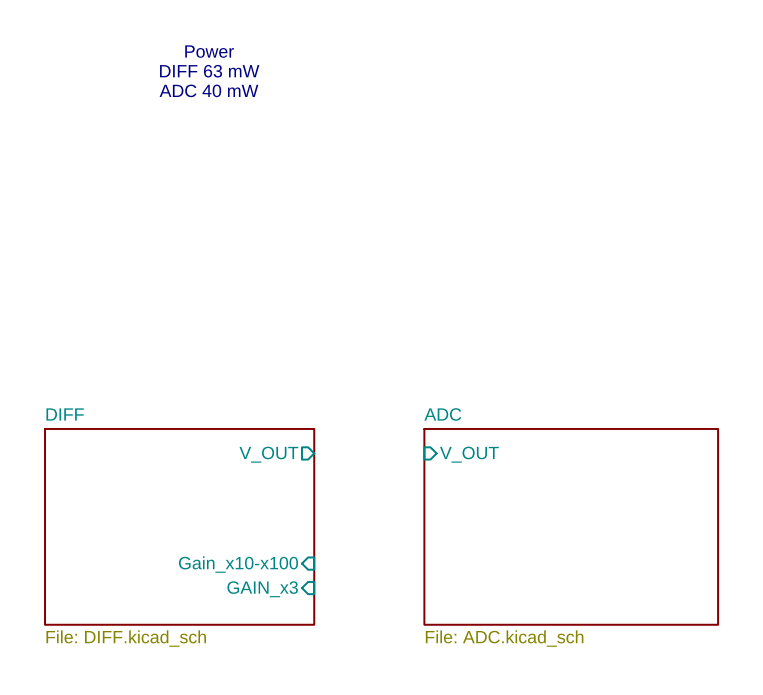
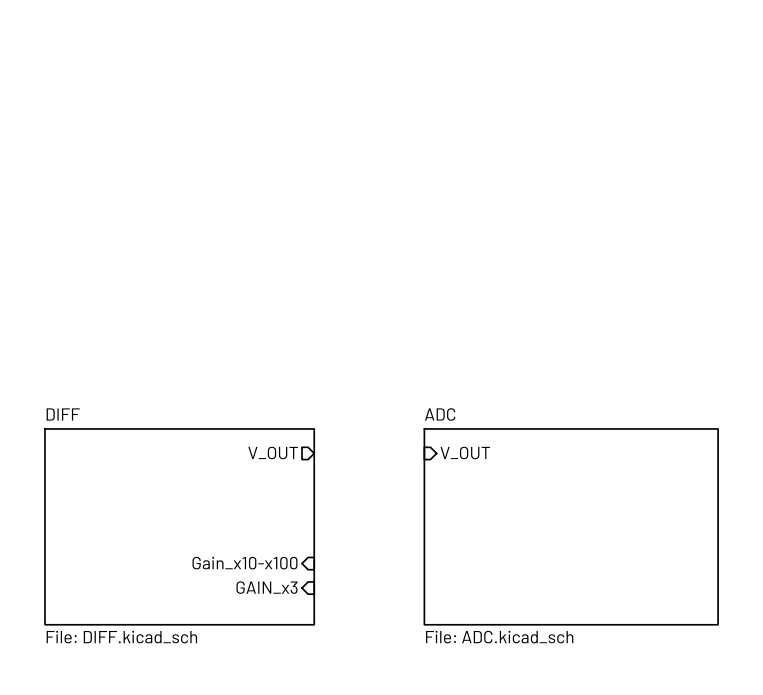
text: Power (209, 51) -> none
text: DIFF 63 mW (209, 71) -> none
text: ADC 40 mW (208, 90) -> none

